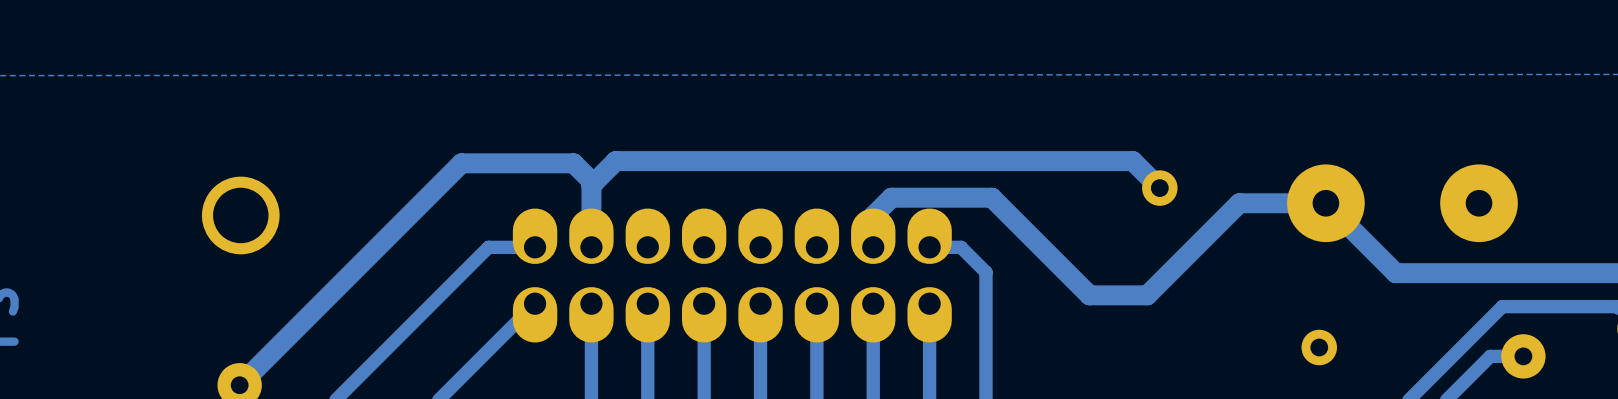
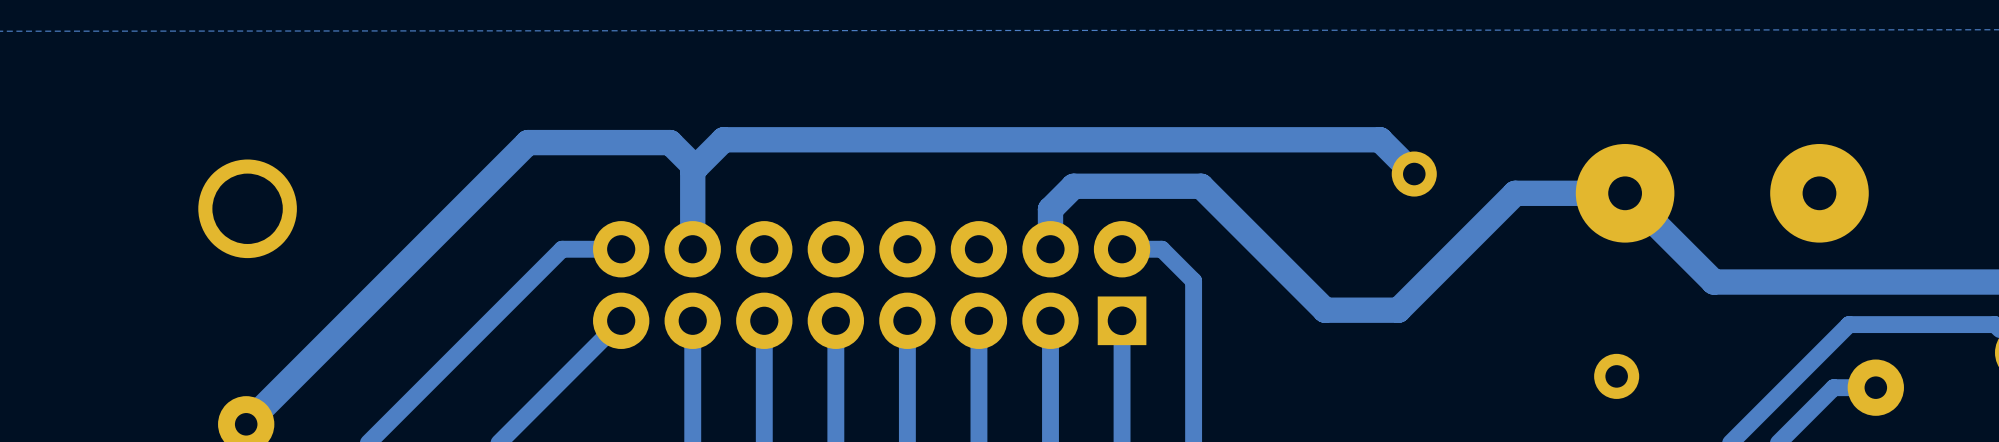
part footprint: [512, 208, 952, 343] -> [593, 221, 1151, 349]

